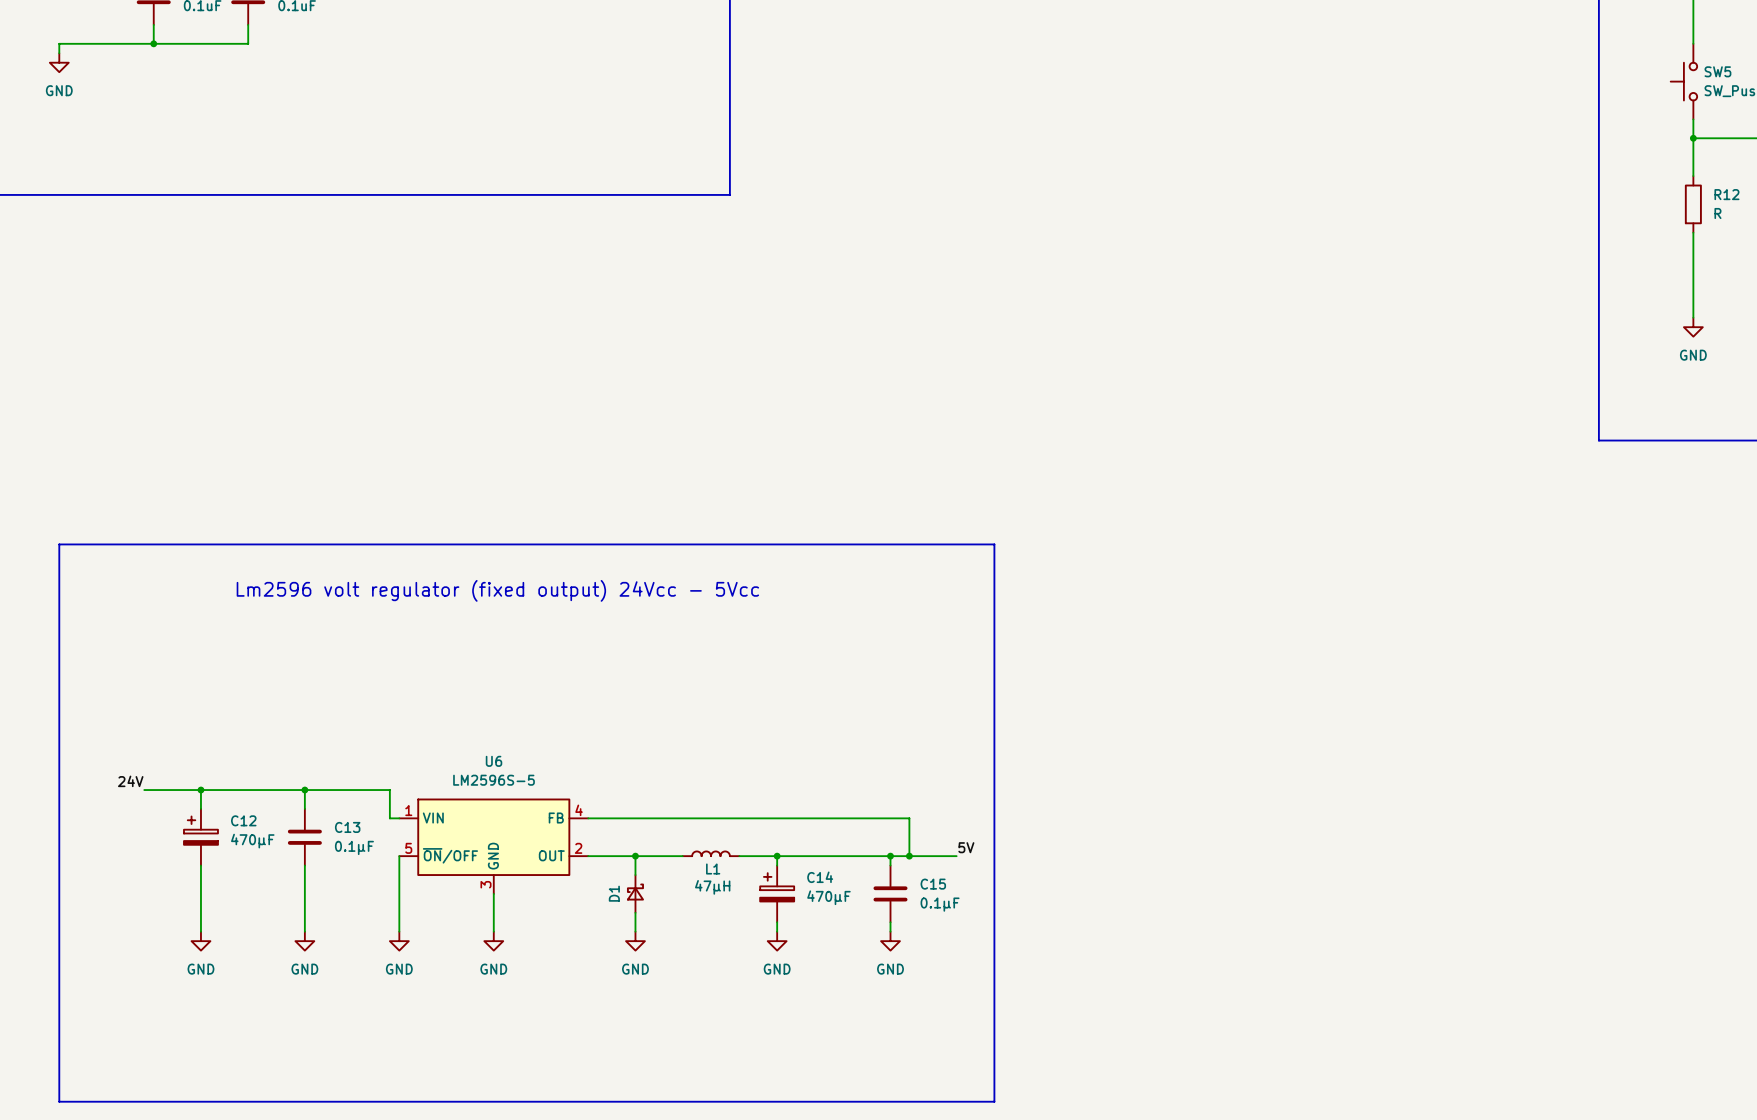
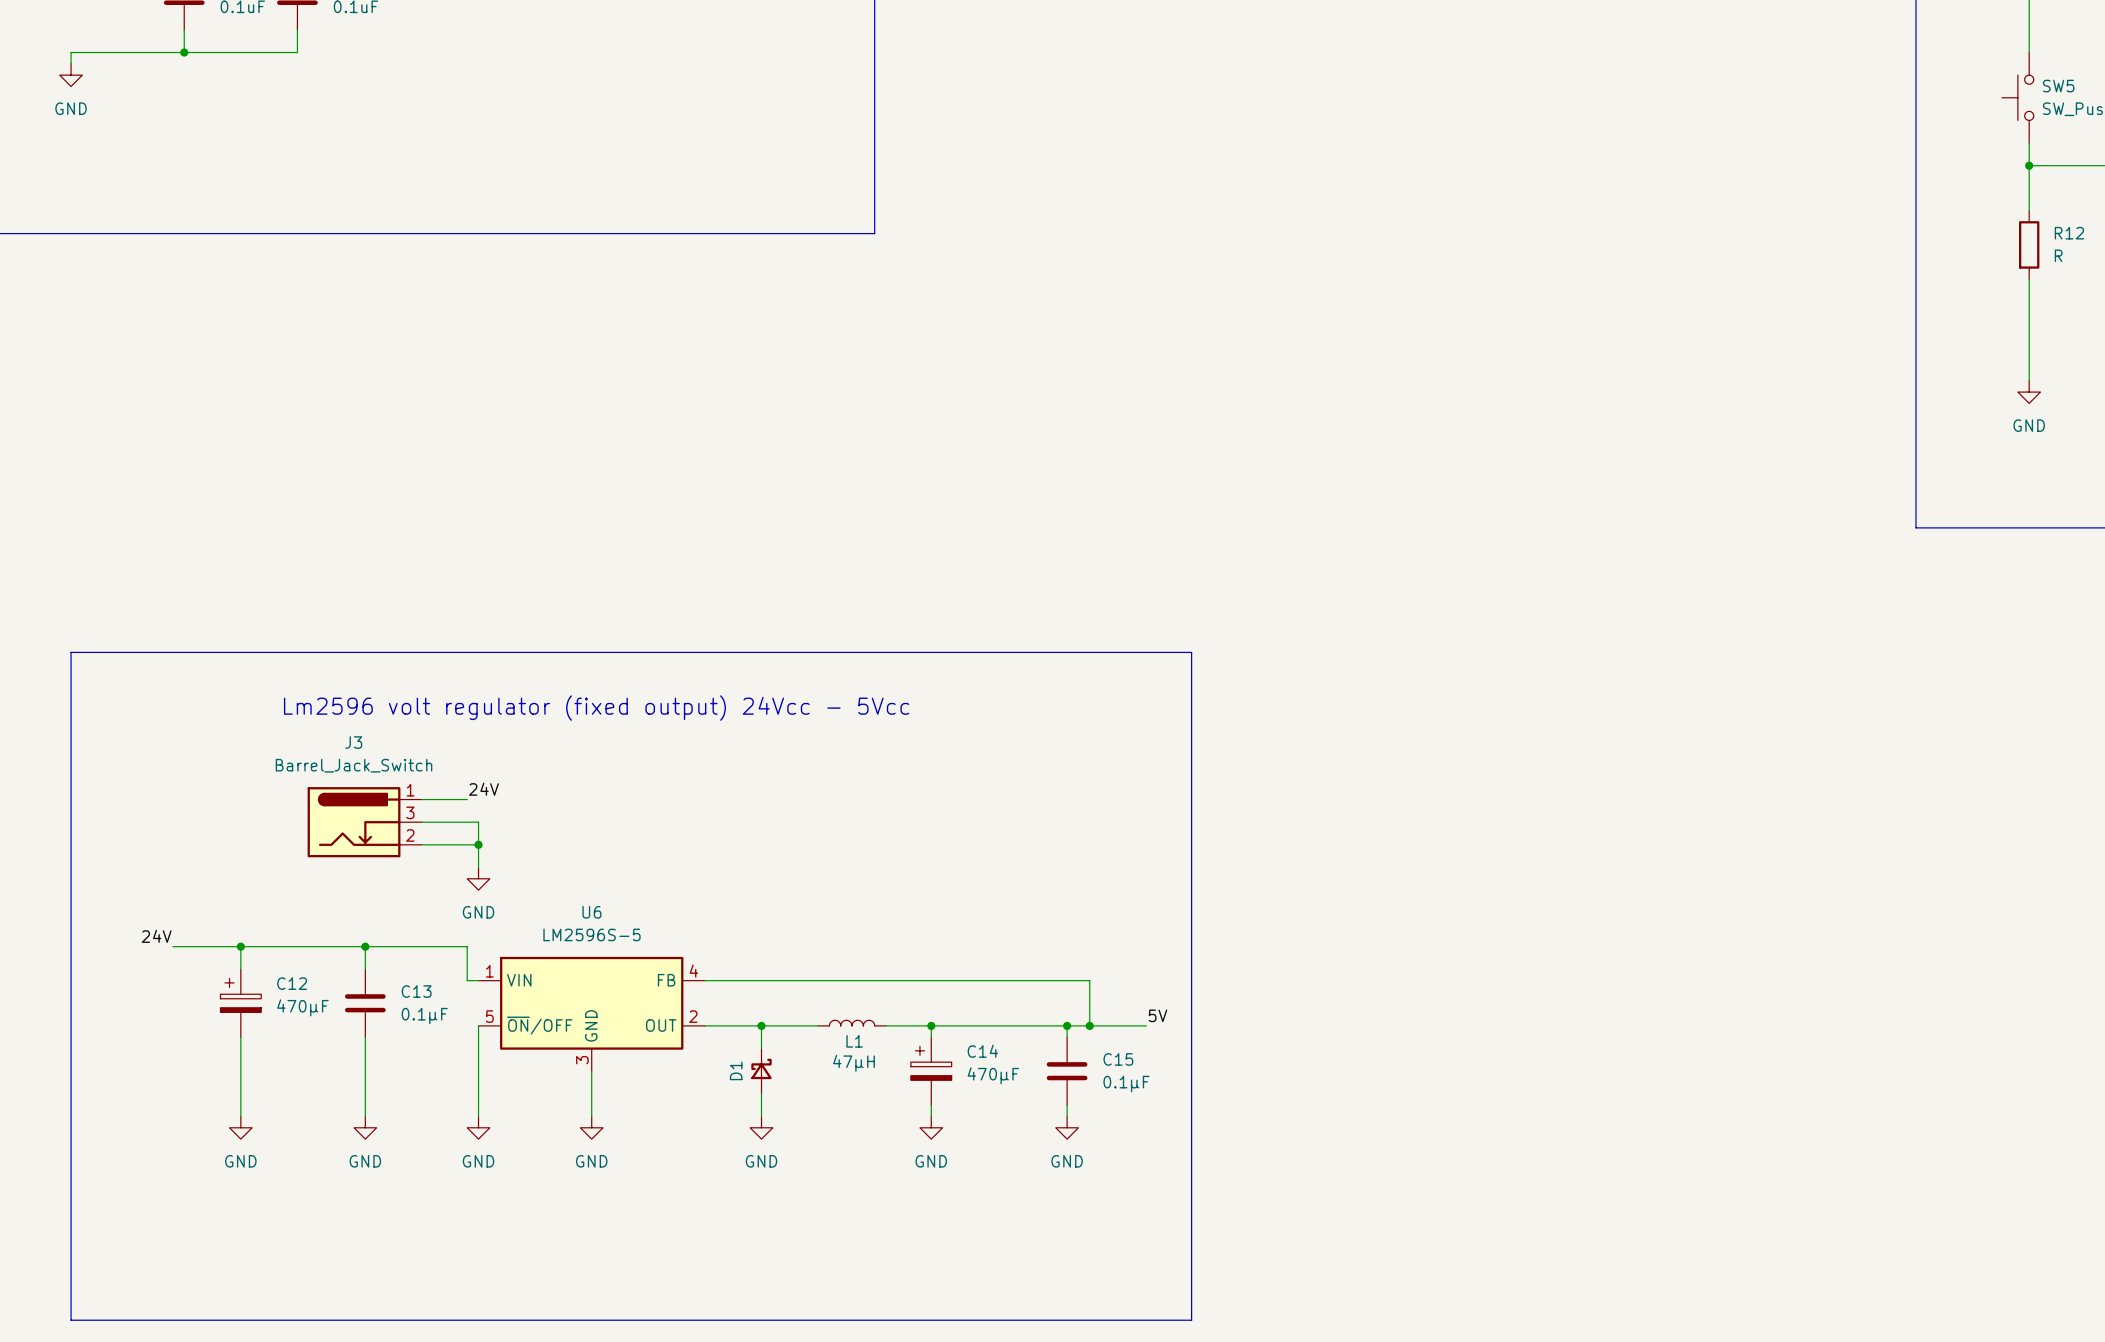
label: none -> 24V (484, 789)
wire: none -> (421, 799) (467, 799)
J3: none -> Barrel_Jack_Switch (364, 822)
wire: none -> (421, 822) (478, 822) (478, 867)
wire: none -> (421, 844) (478, 844)
junction: none -> (478, 844)
power symbol: none -> GND (478, 878)

